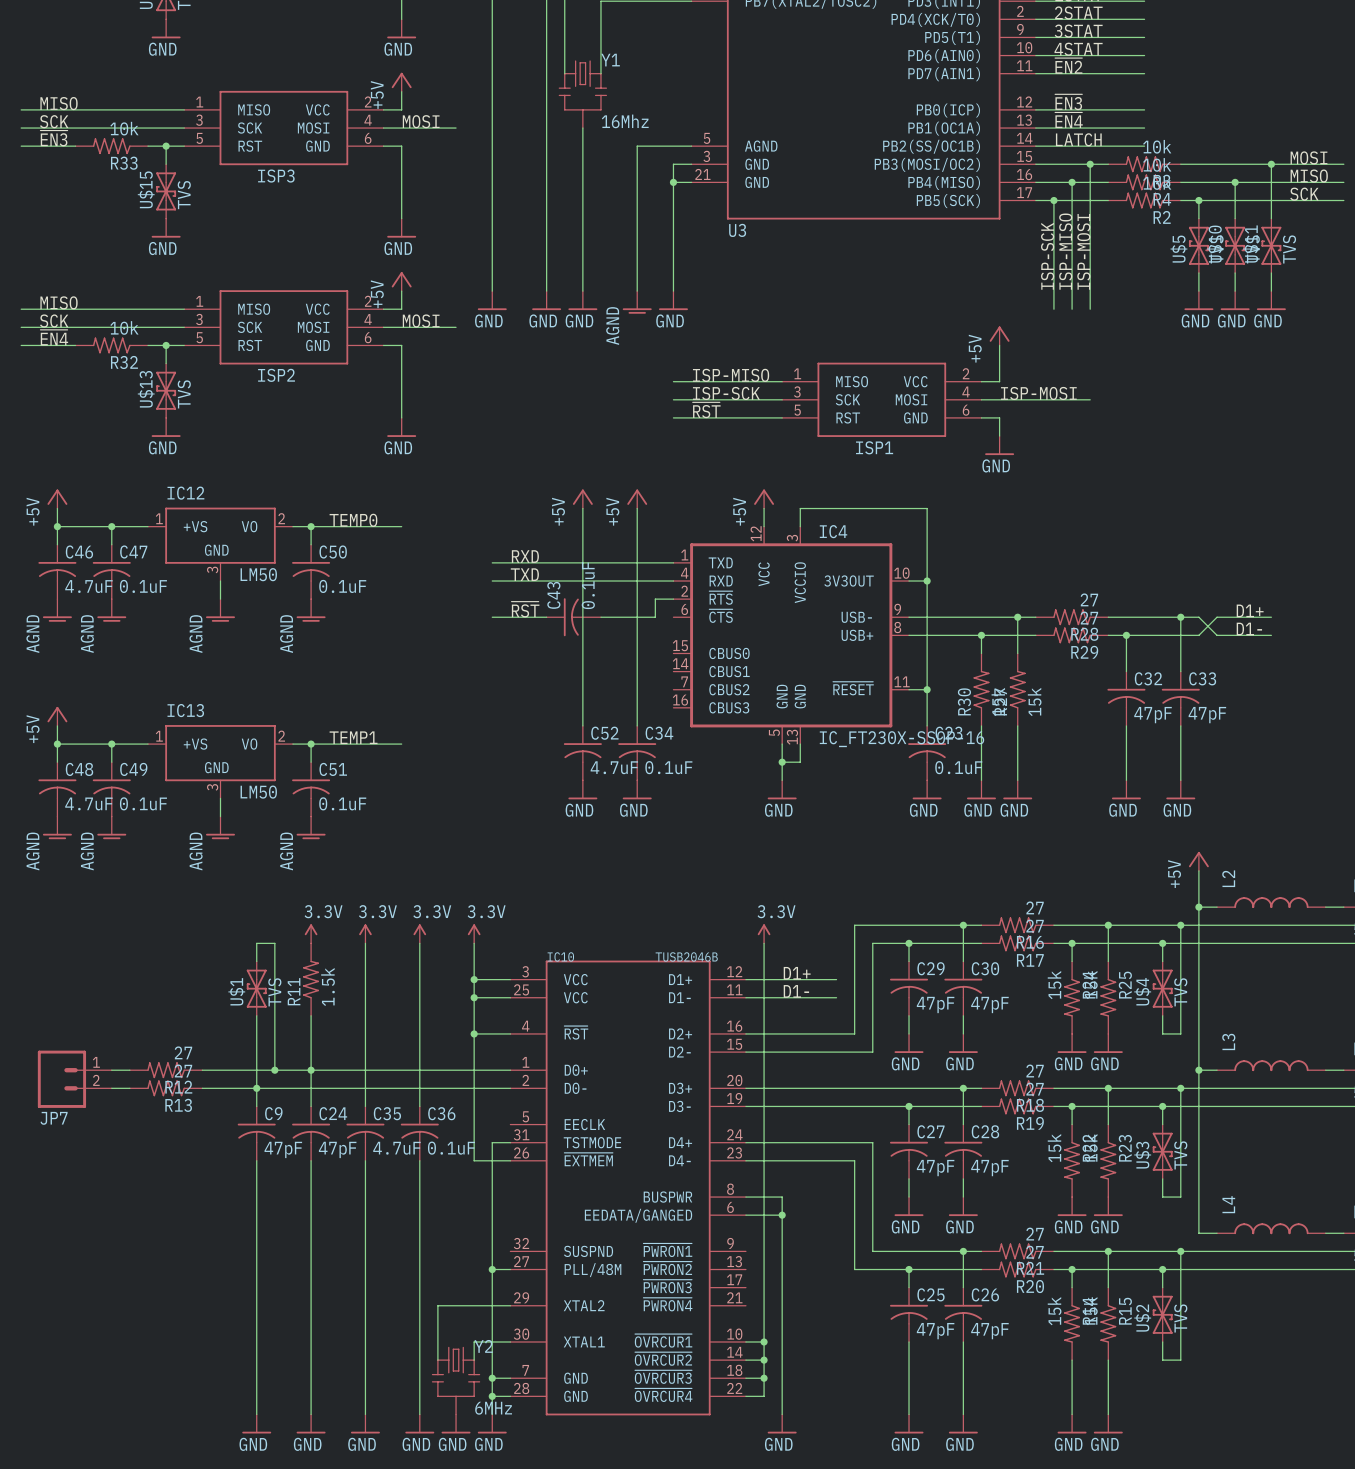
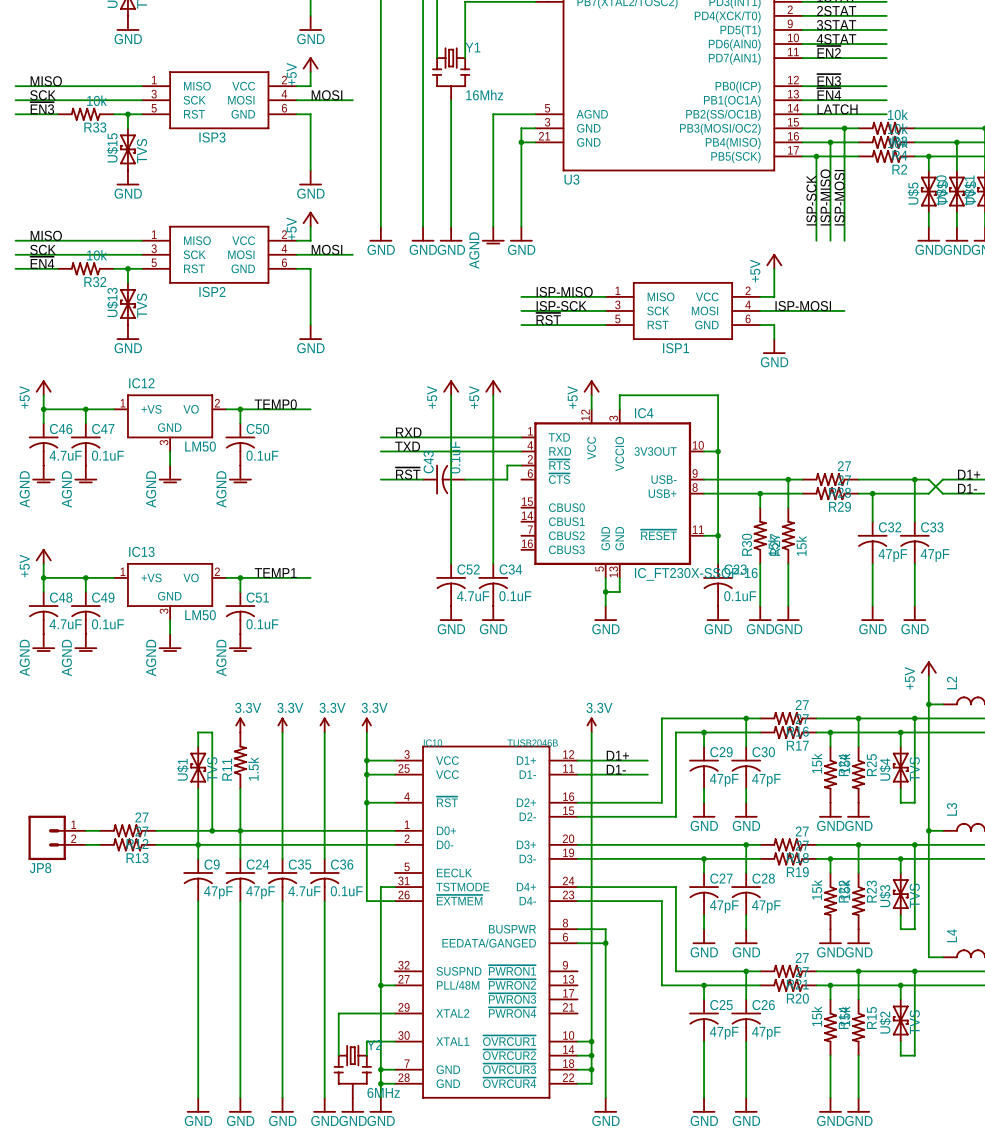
JP7 name: JP7 (54, 1118) -> JP8 (40, 868)

